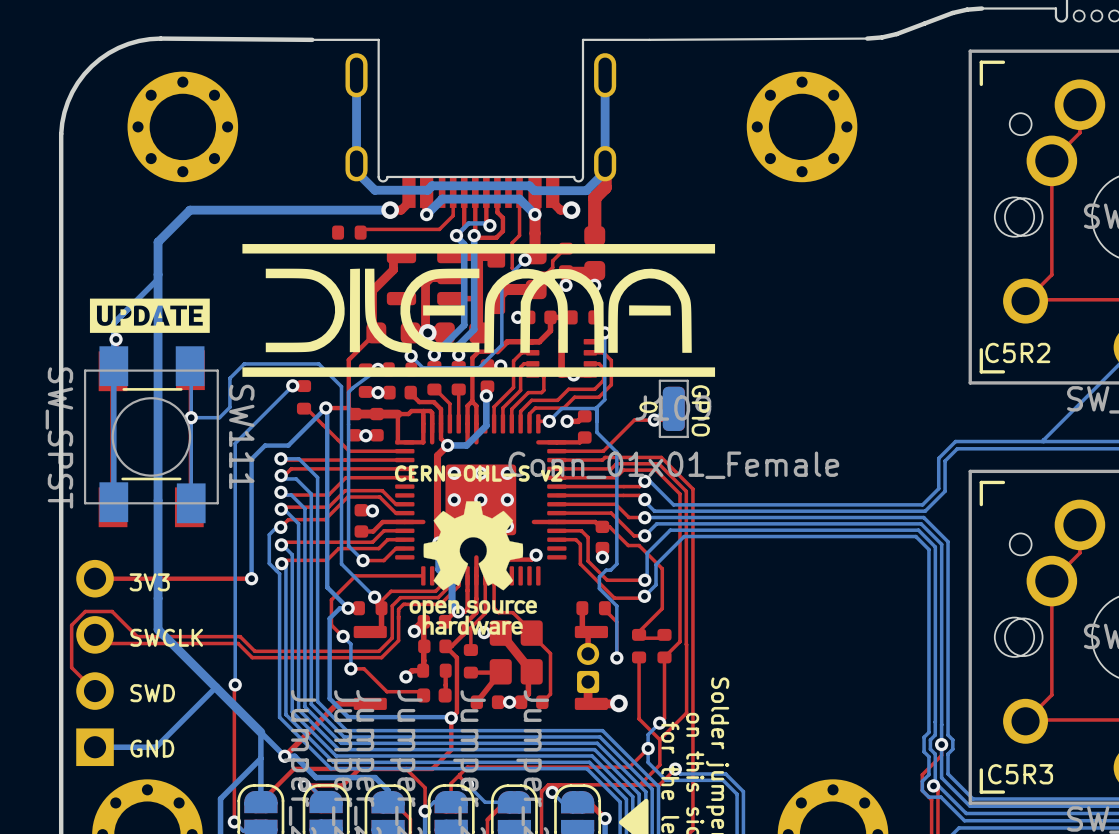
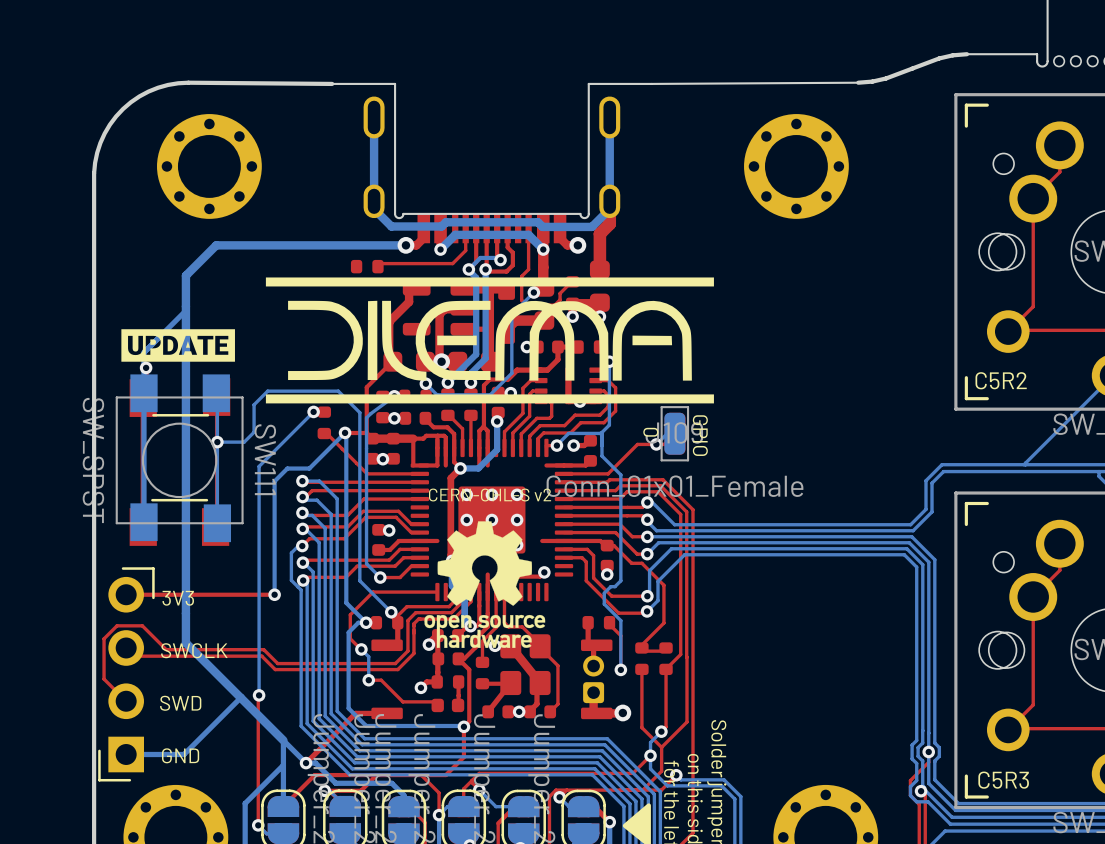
part footprint: [76, 559, 114, 767] -> [98, 567, 155, 782]

